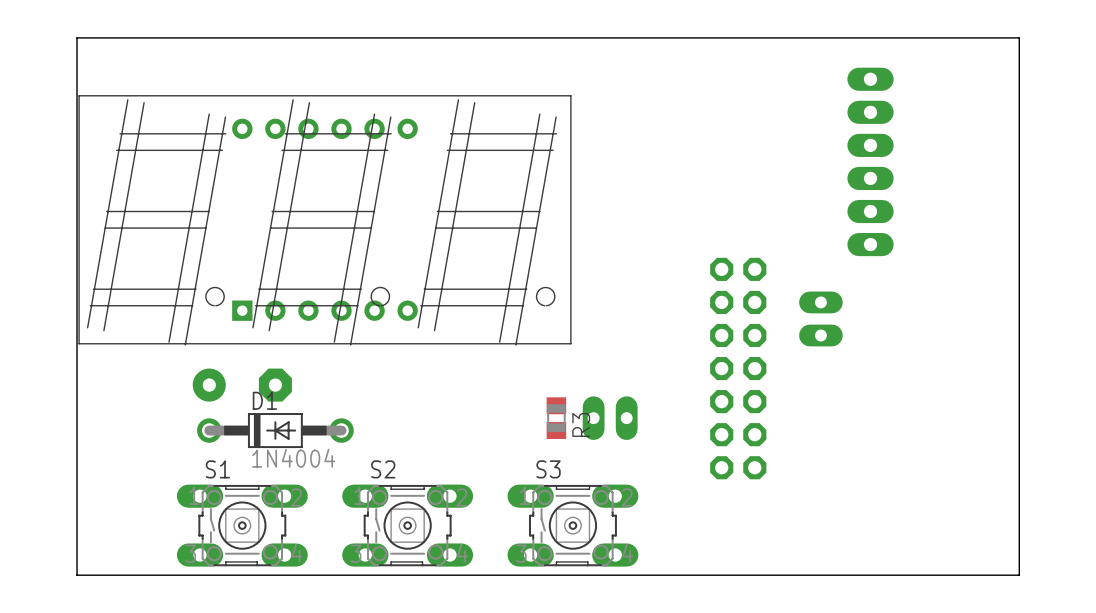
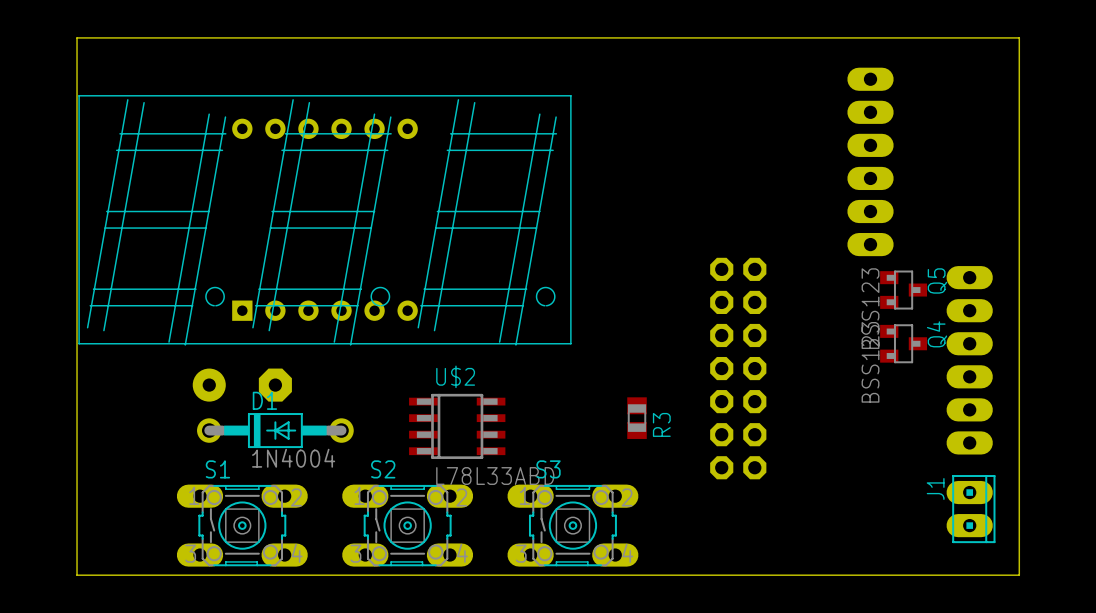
Q5: none -> BSS123 (903, 290)
part: (820, 318) -> none
Q4: none -> BSS123 (903, 343)
part: none -> (969, 360)
R3 position: (556, 418) -> (637, 418)
part: (610, 418) -> none
U$2: none -> L78L33ABD (457, 426)
J1: none -> (971, 509)

